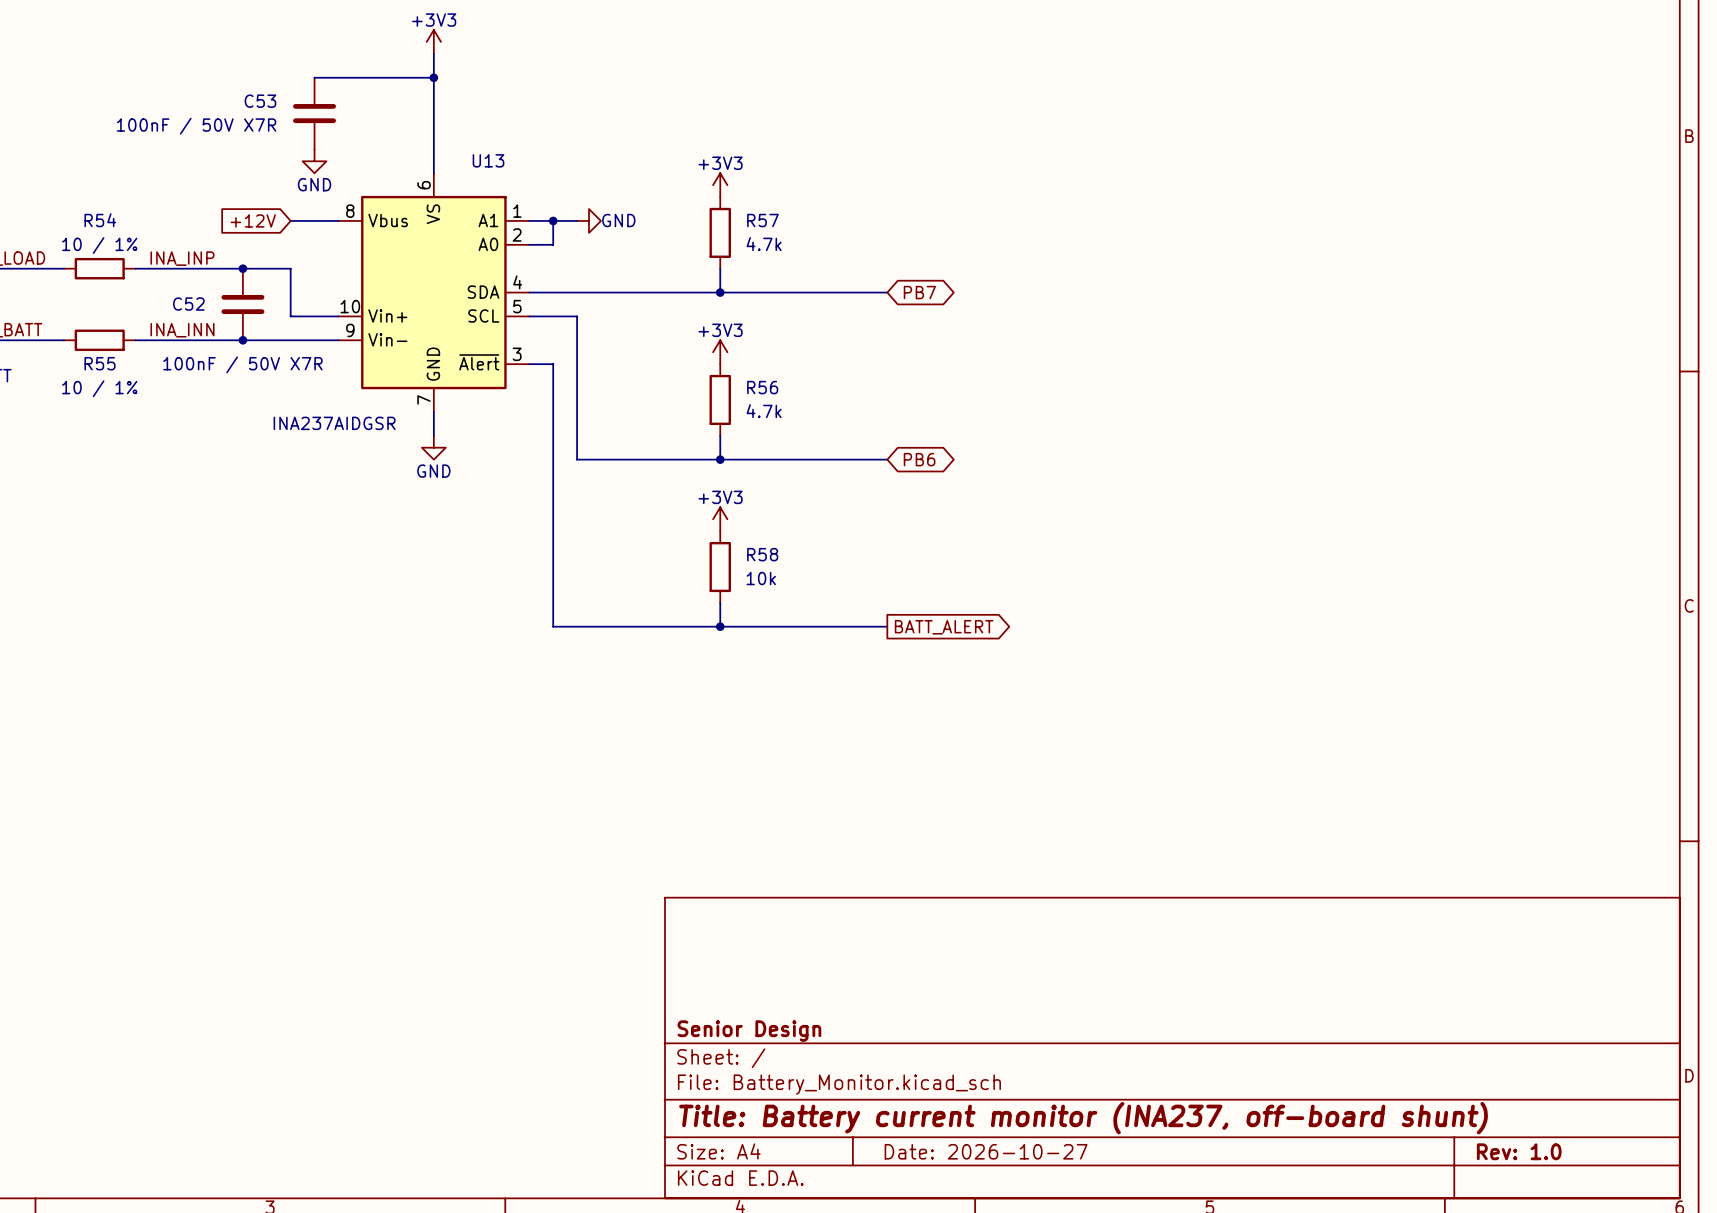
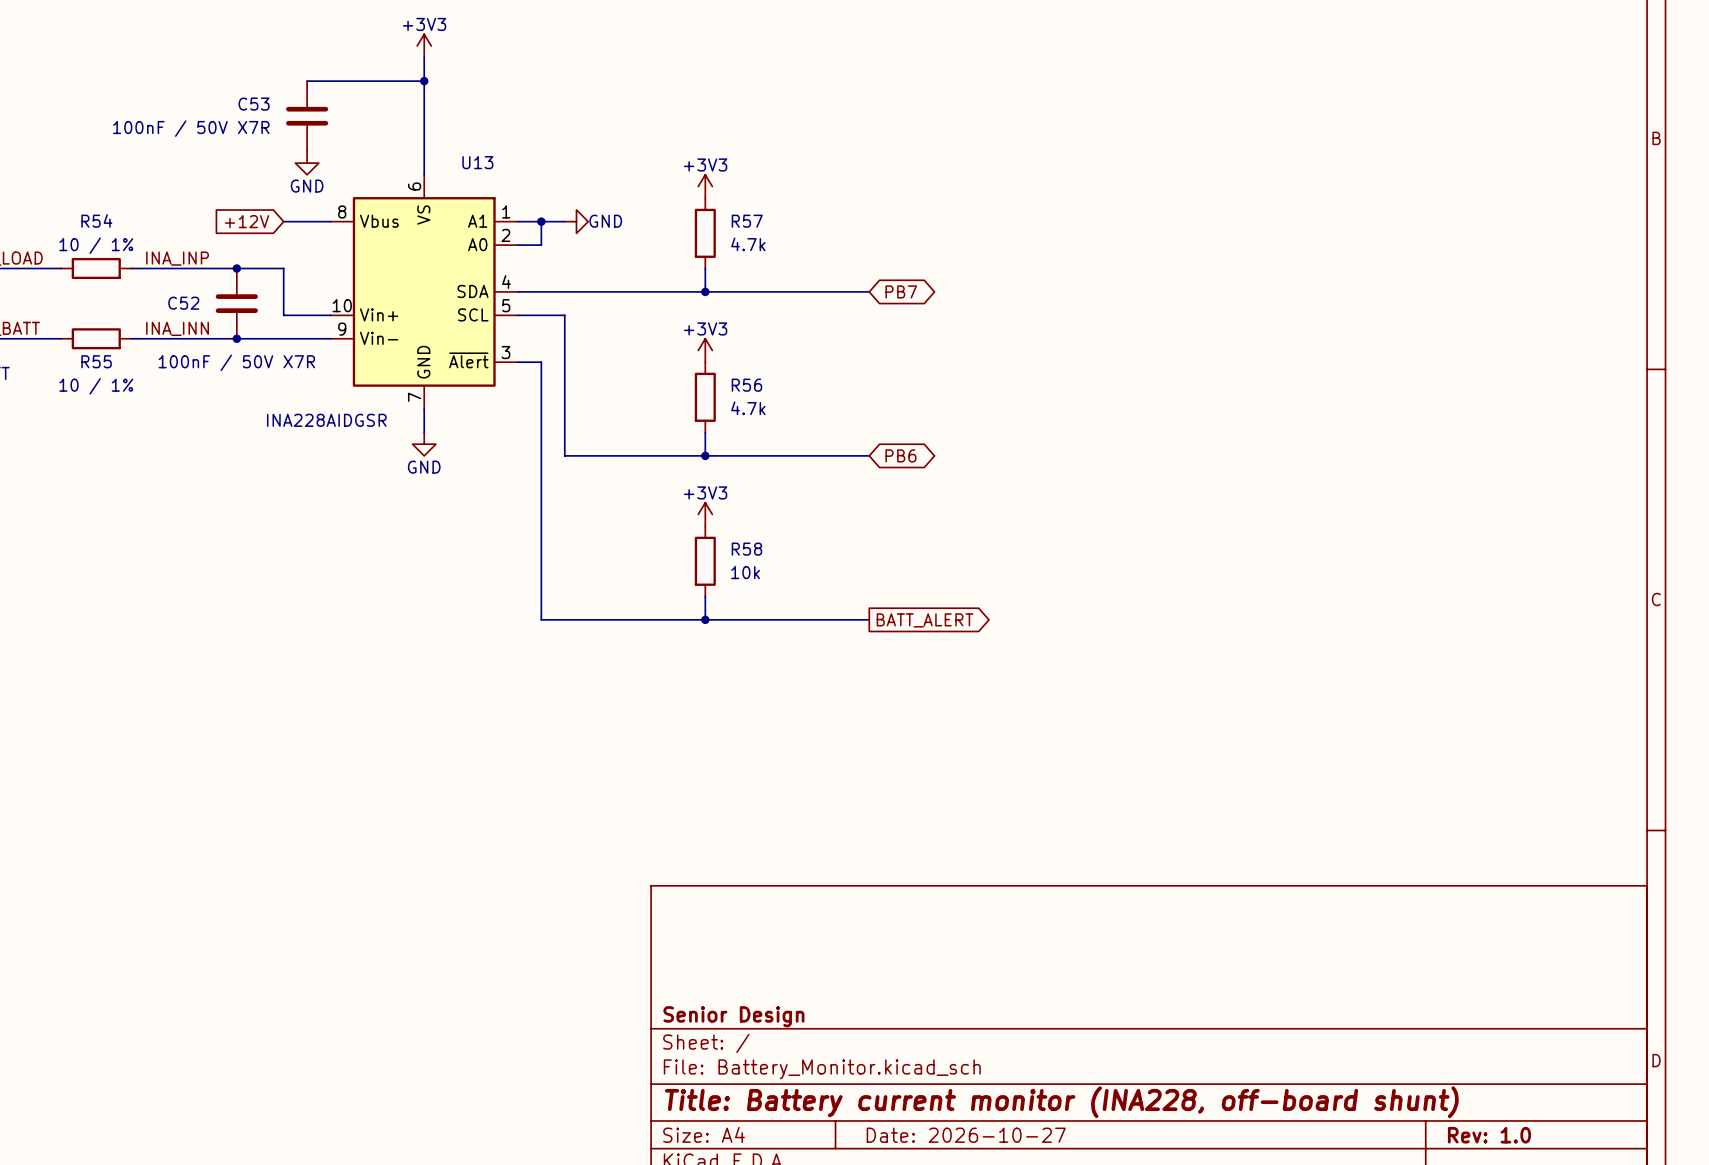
U13 value: INA237AIDGSR (334, 423) -> INA228AIDGSR (326, 420)
title block: Title: Battery current monitor (INA237, off-board shunt) (1083, 1118) -> Title: Battery current monitor (INA228, off-board shunt) (1061, 1102)

